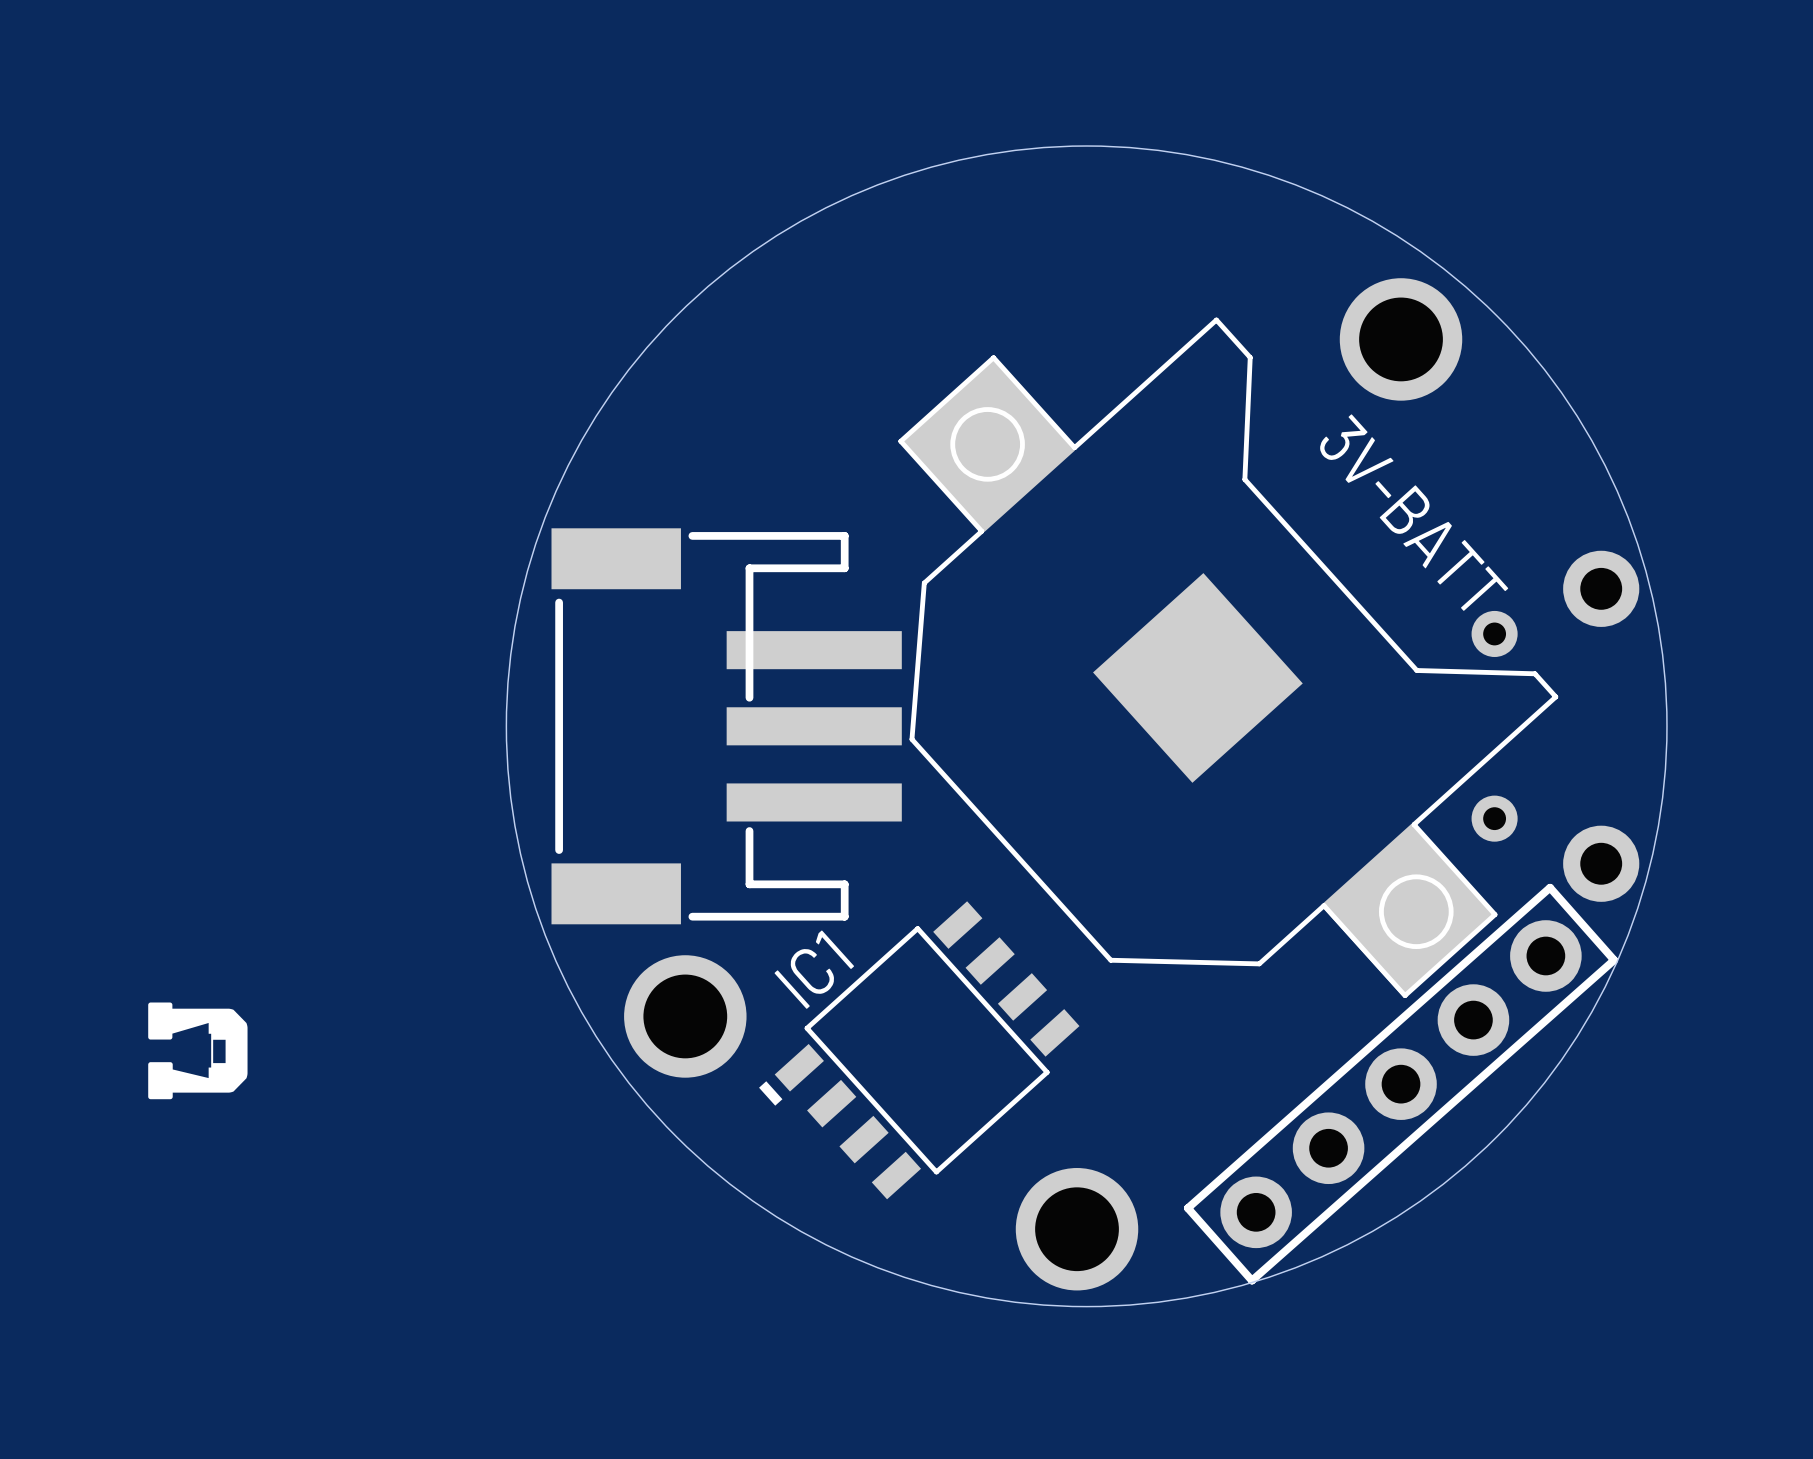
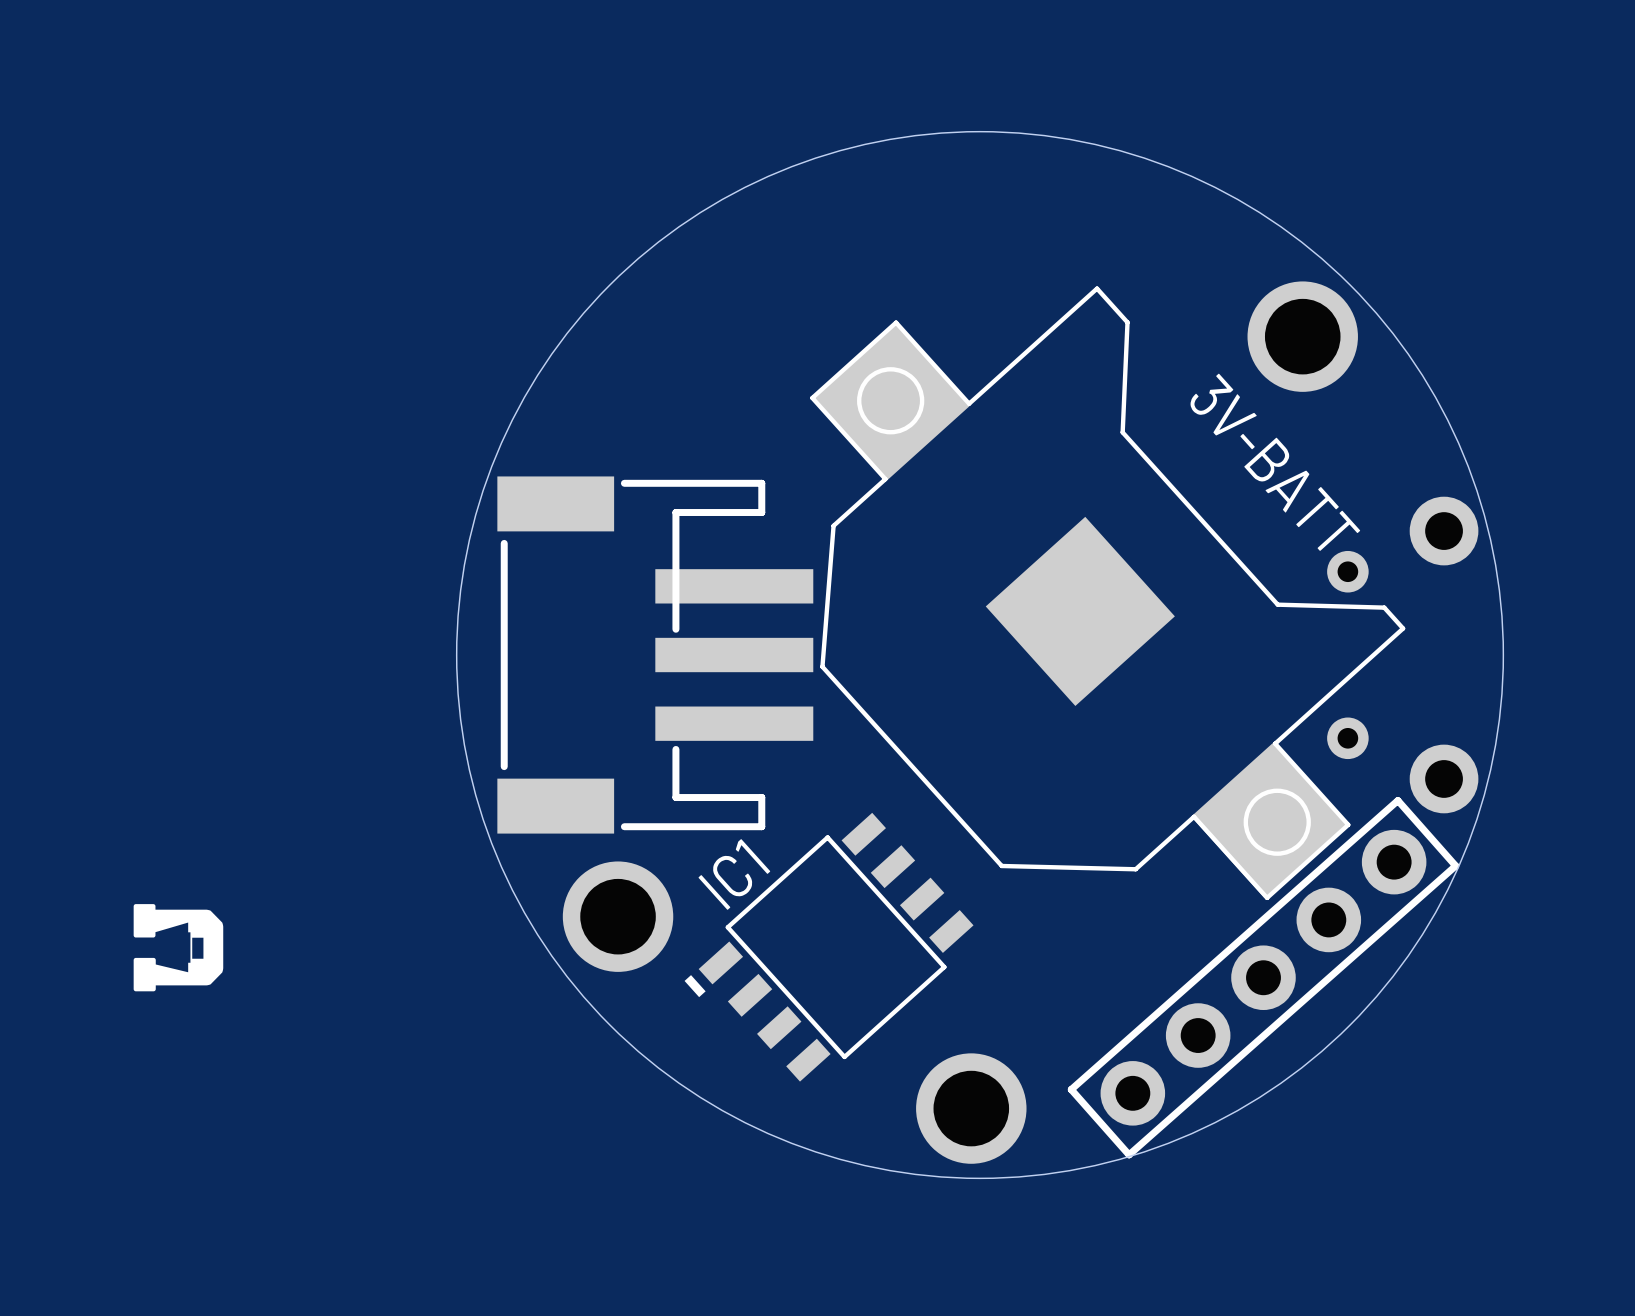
part position: (1401, 339) -> (1302, 336)

